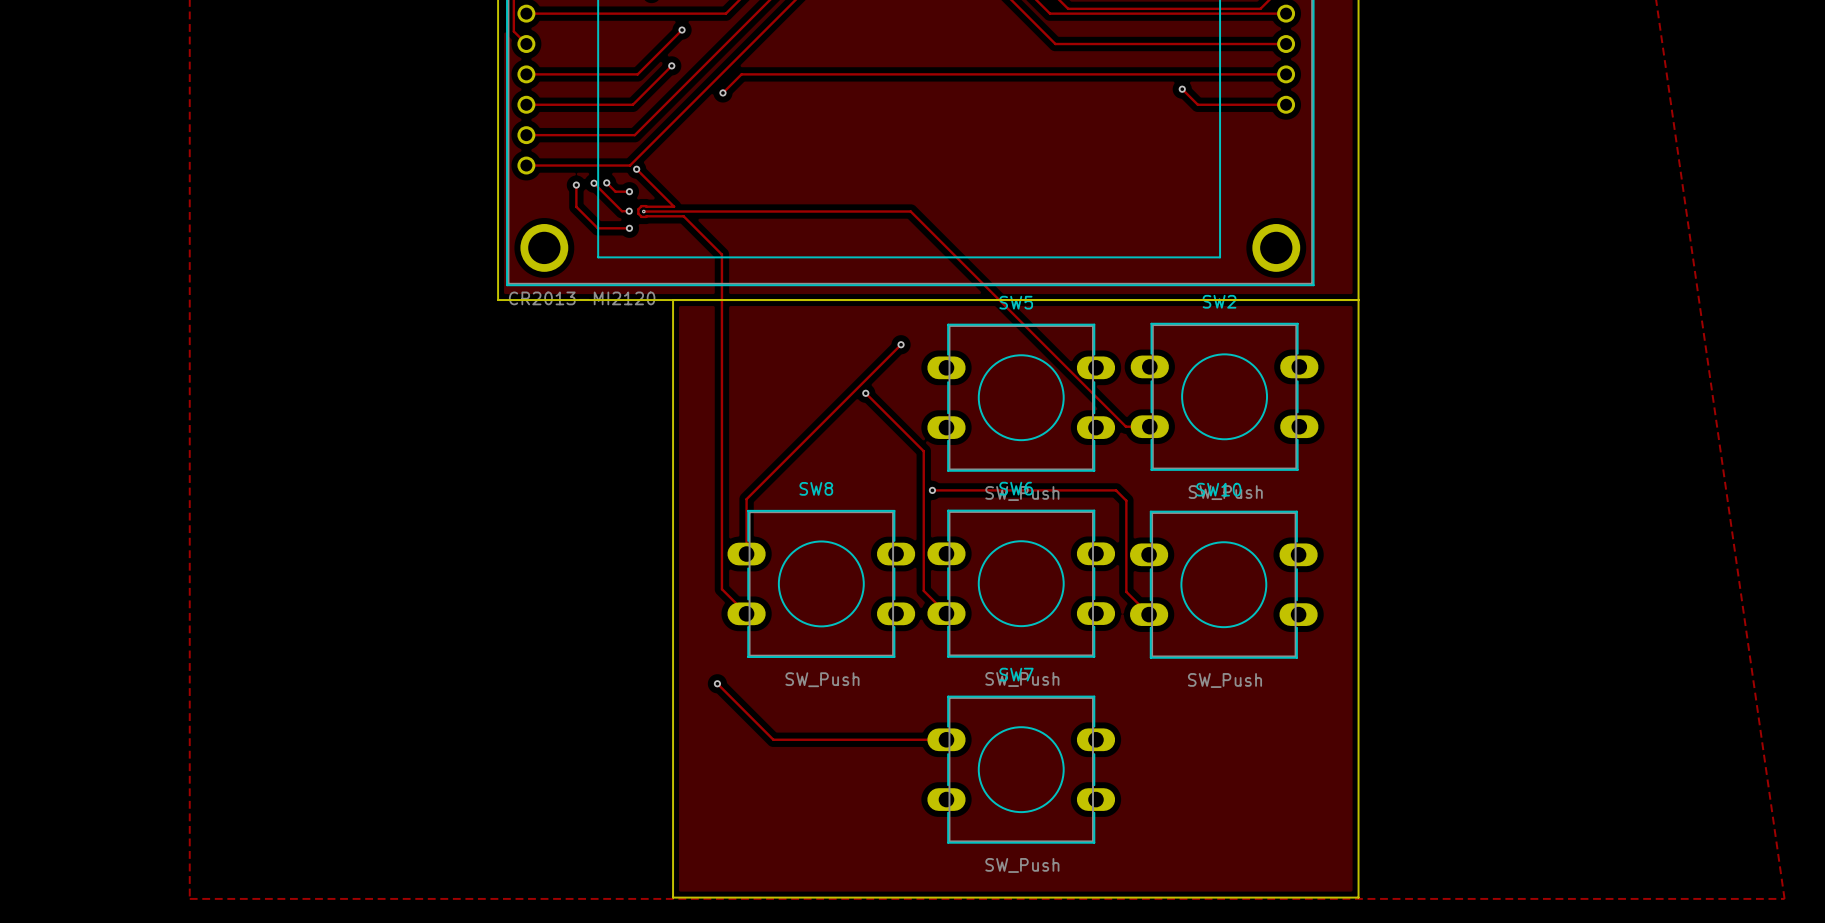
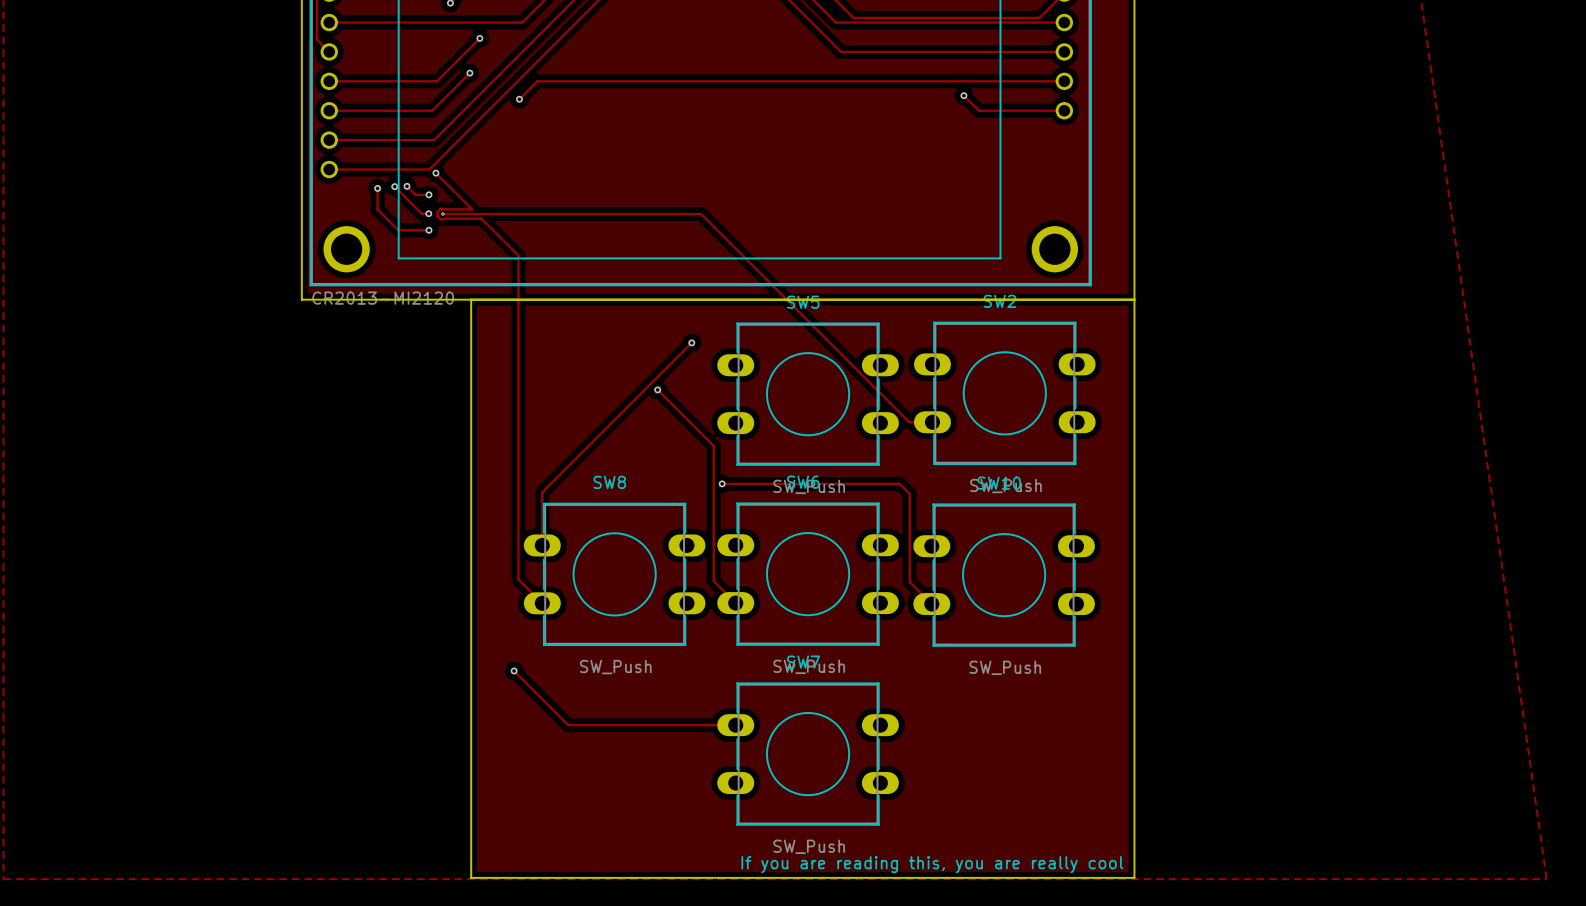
text: none -> If you are reading this, you are really cool (932, 864)

